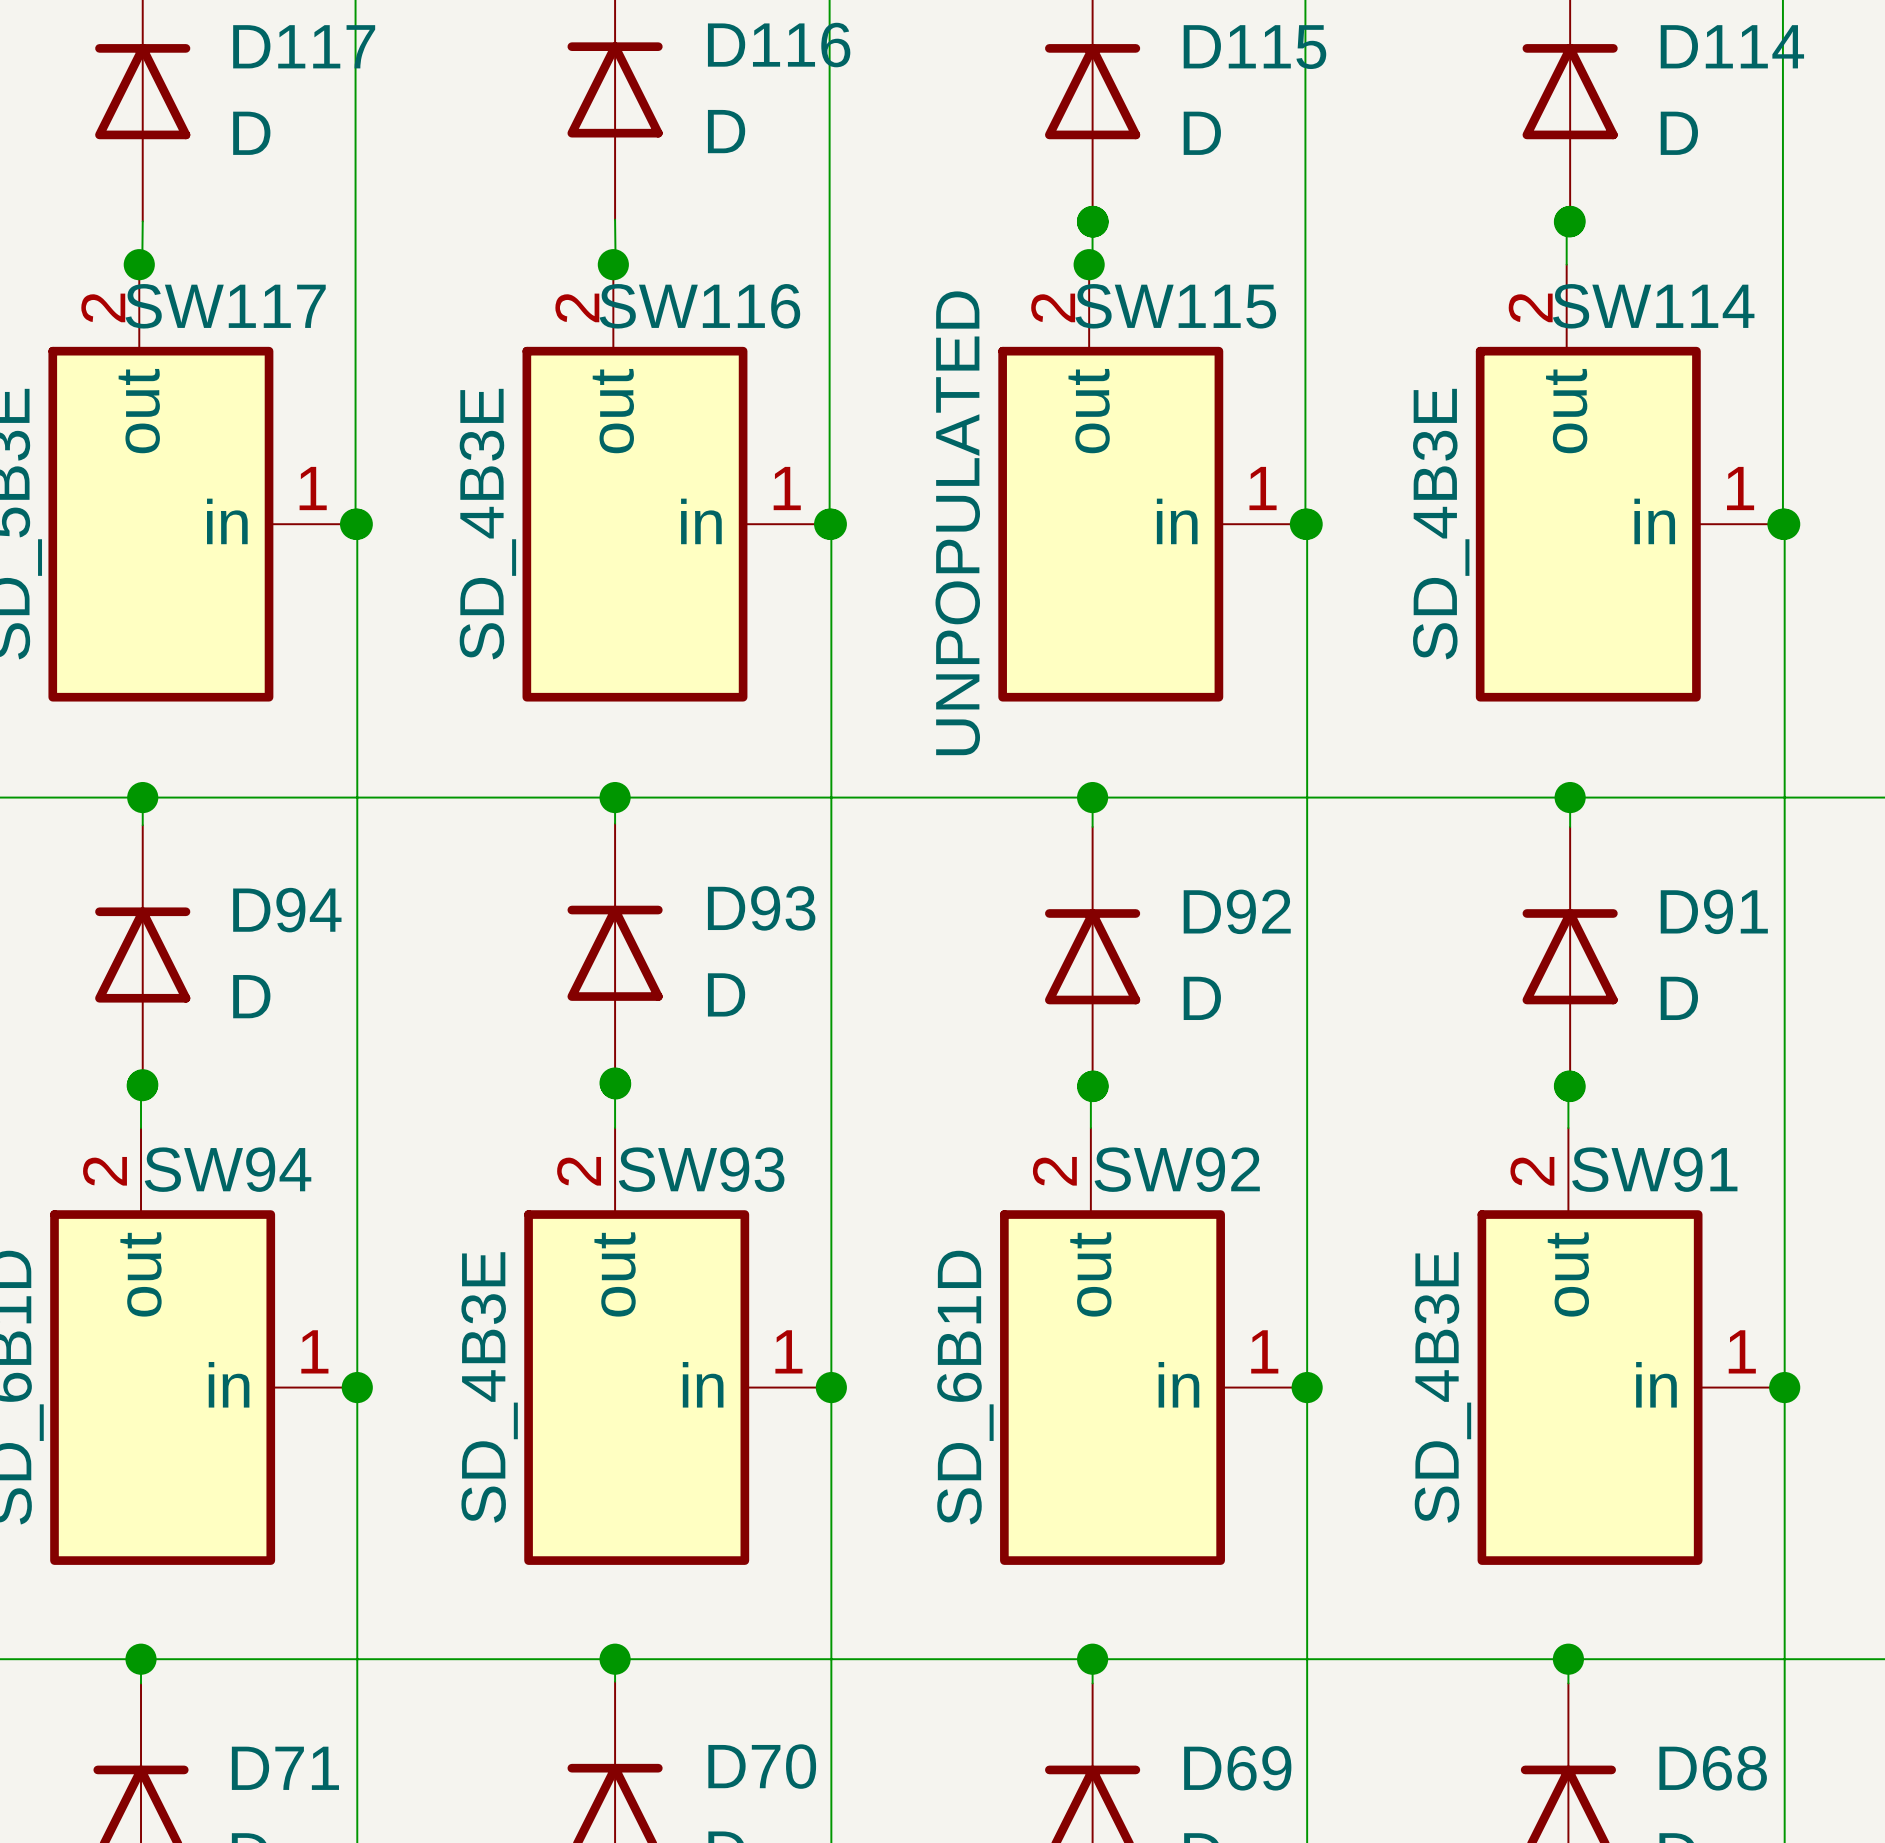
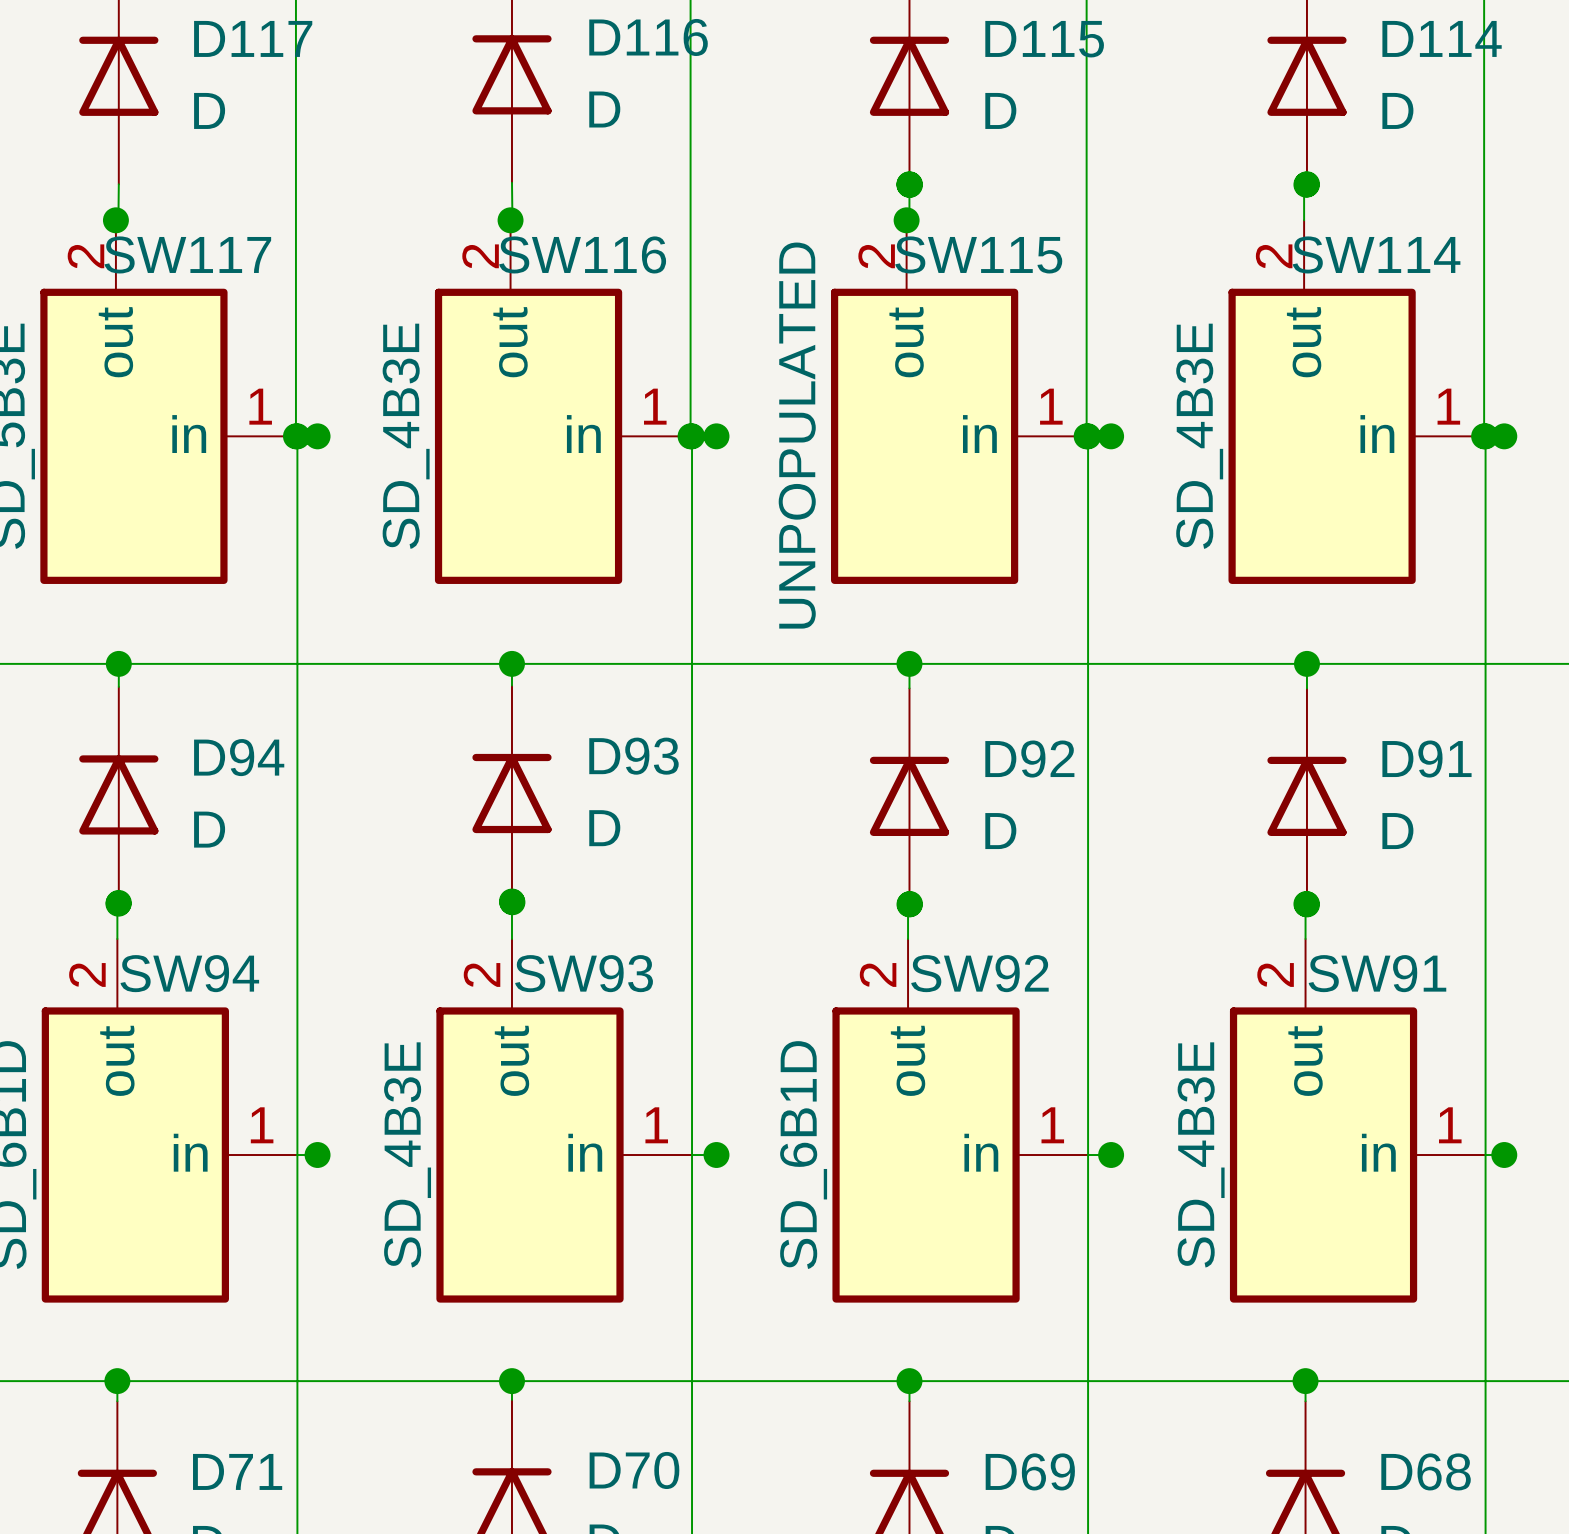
junction: none -> (317, 436)
junction: none -> (716, 436)
junction: none -> (1111, 436)
junction: none -> (1504, 436)
junction position: (357, 1387) -> (317, 1155)
junction position: (831, 1387) -> (716, 1155)
junction position: (1307, 1387) -> (1111, 1155)
junction position: (1784, 1387) -> (1504, 1155)

